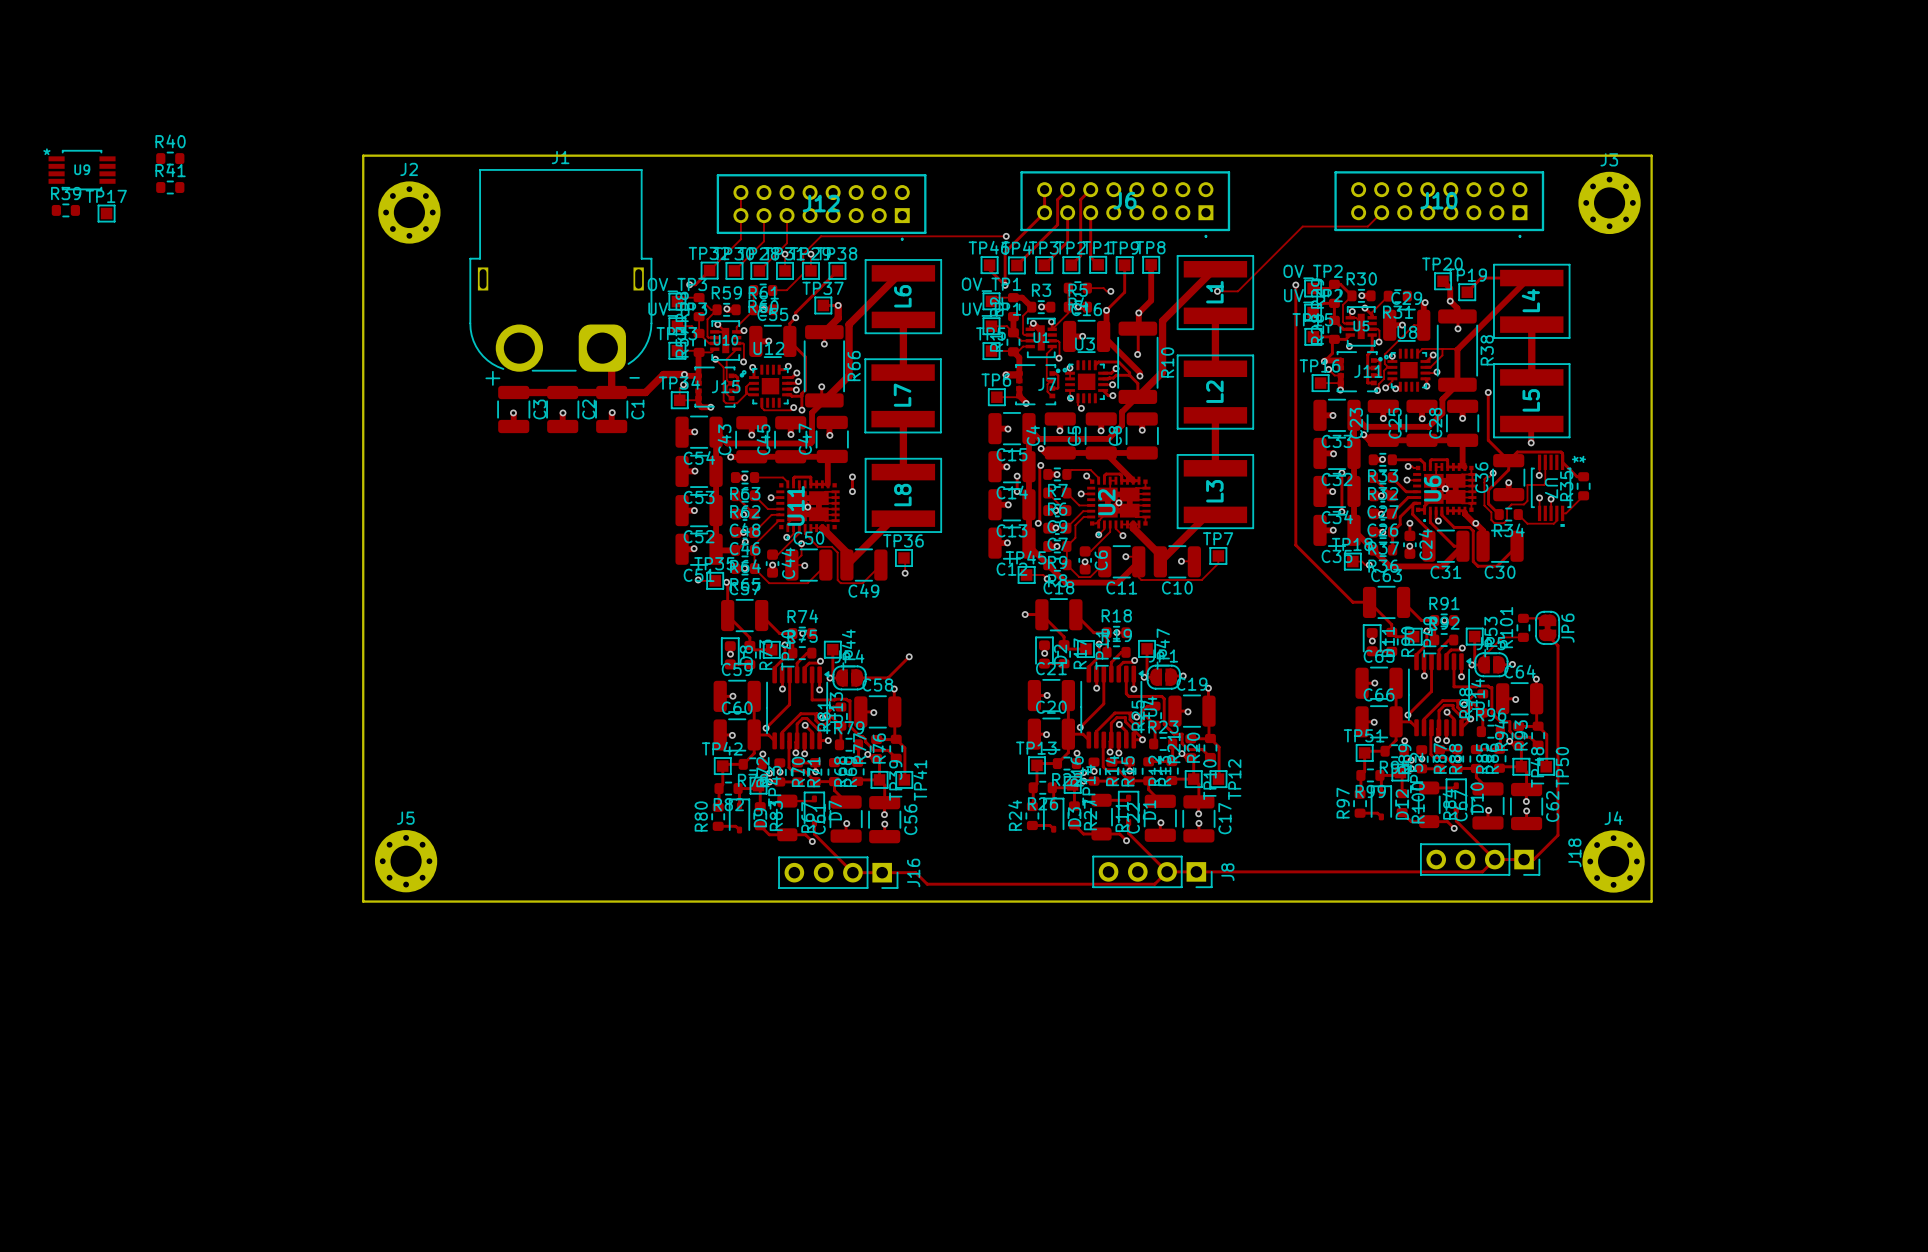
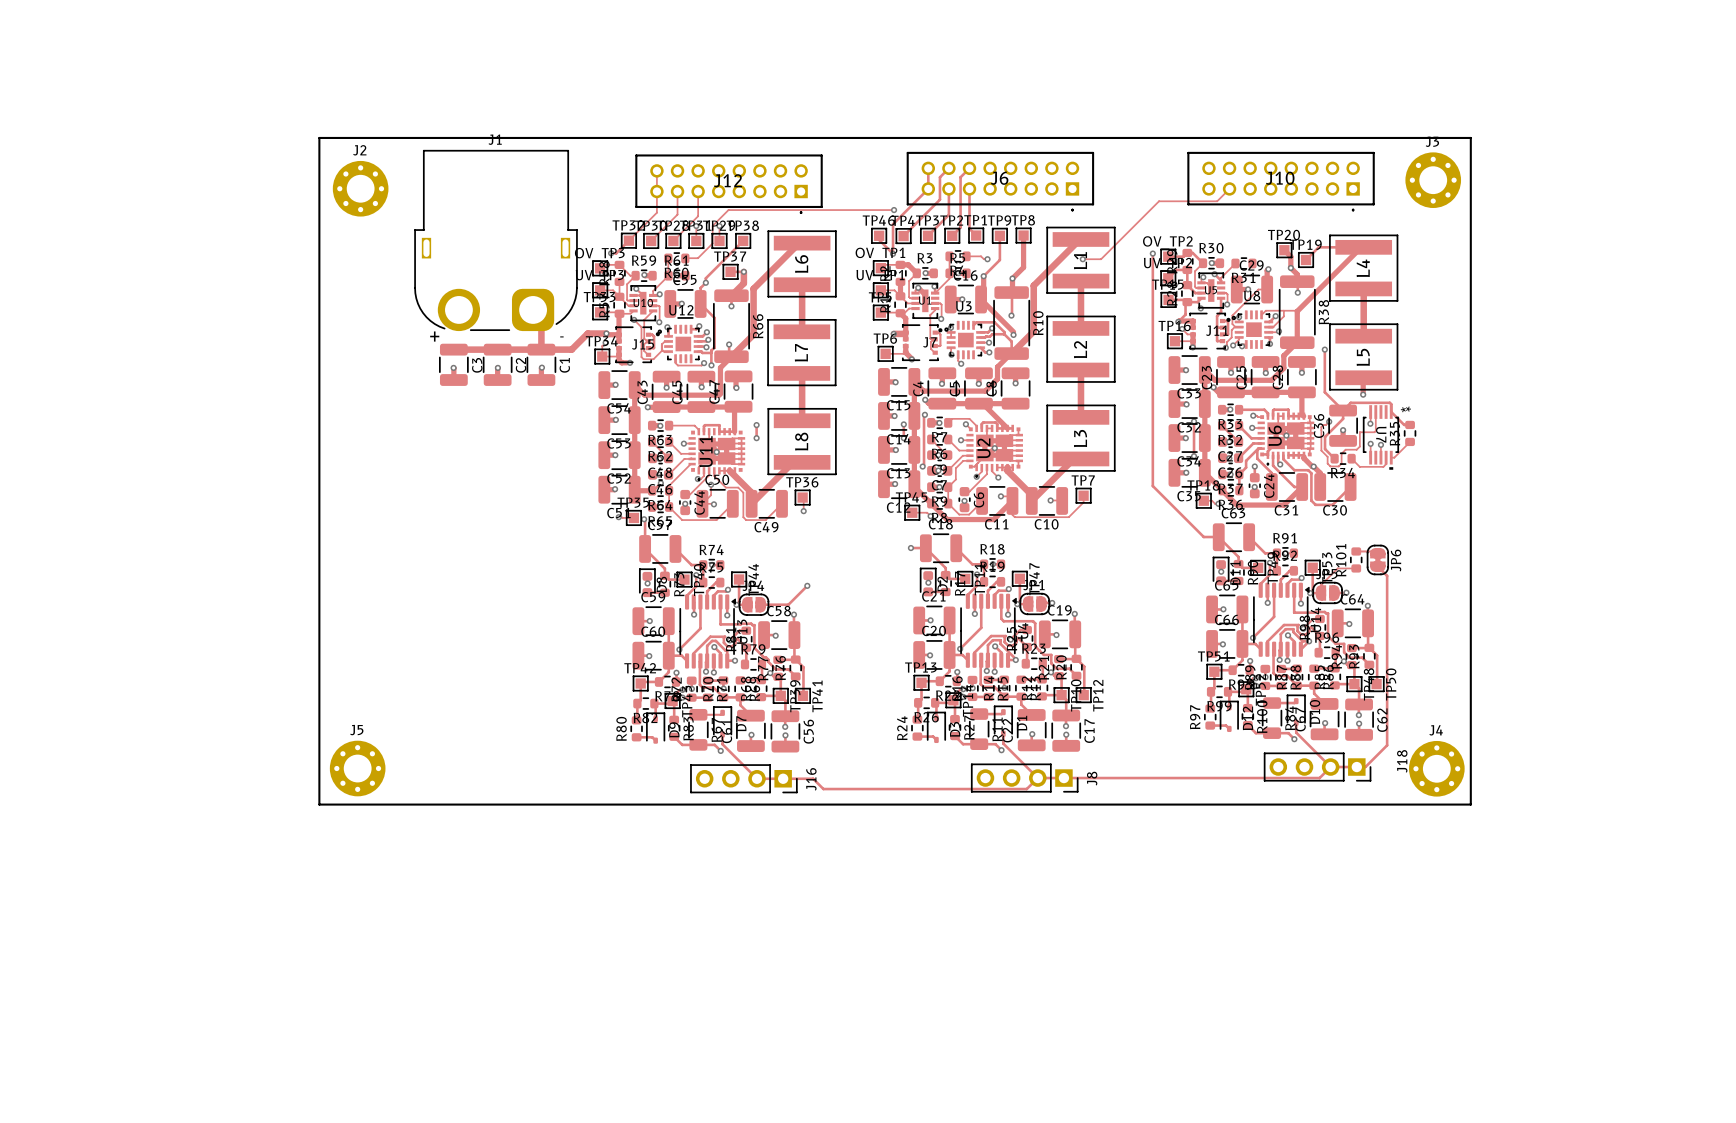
R40: (170, 158) -> none
U9: (82, 170) -> none
R41: (170, 187) -> none
R39: (65, 210) -> none
TP17: (106, 213) -> none

